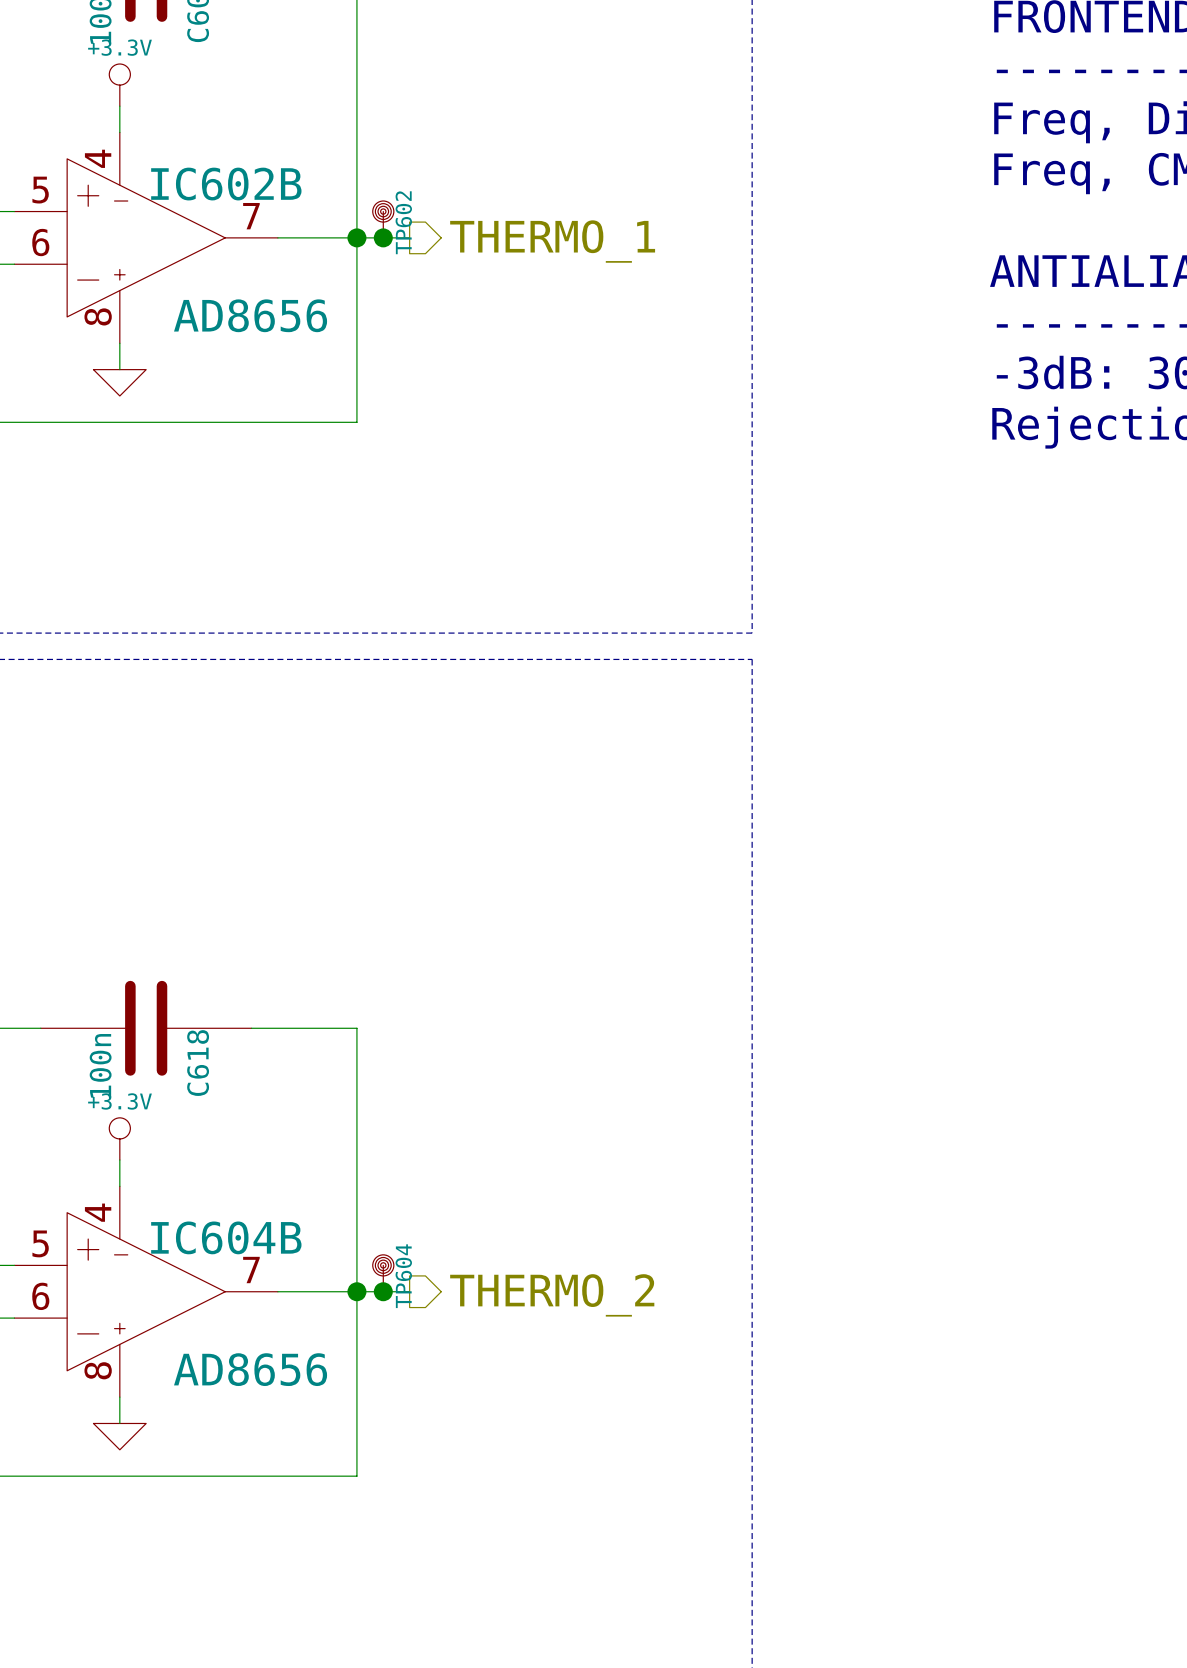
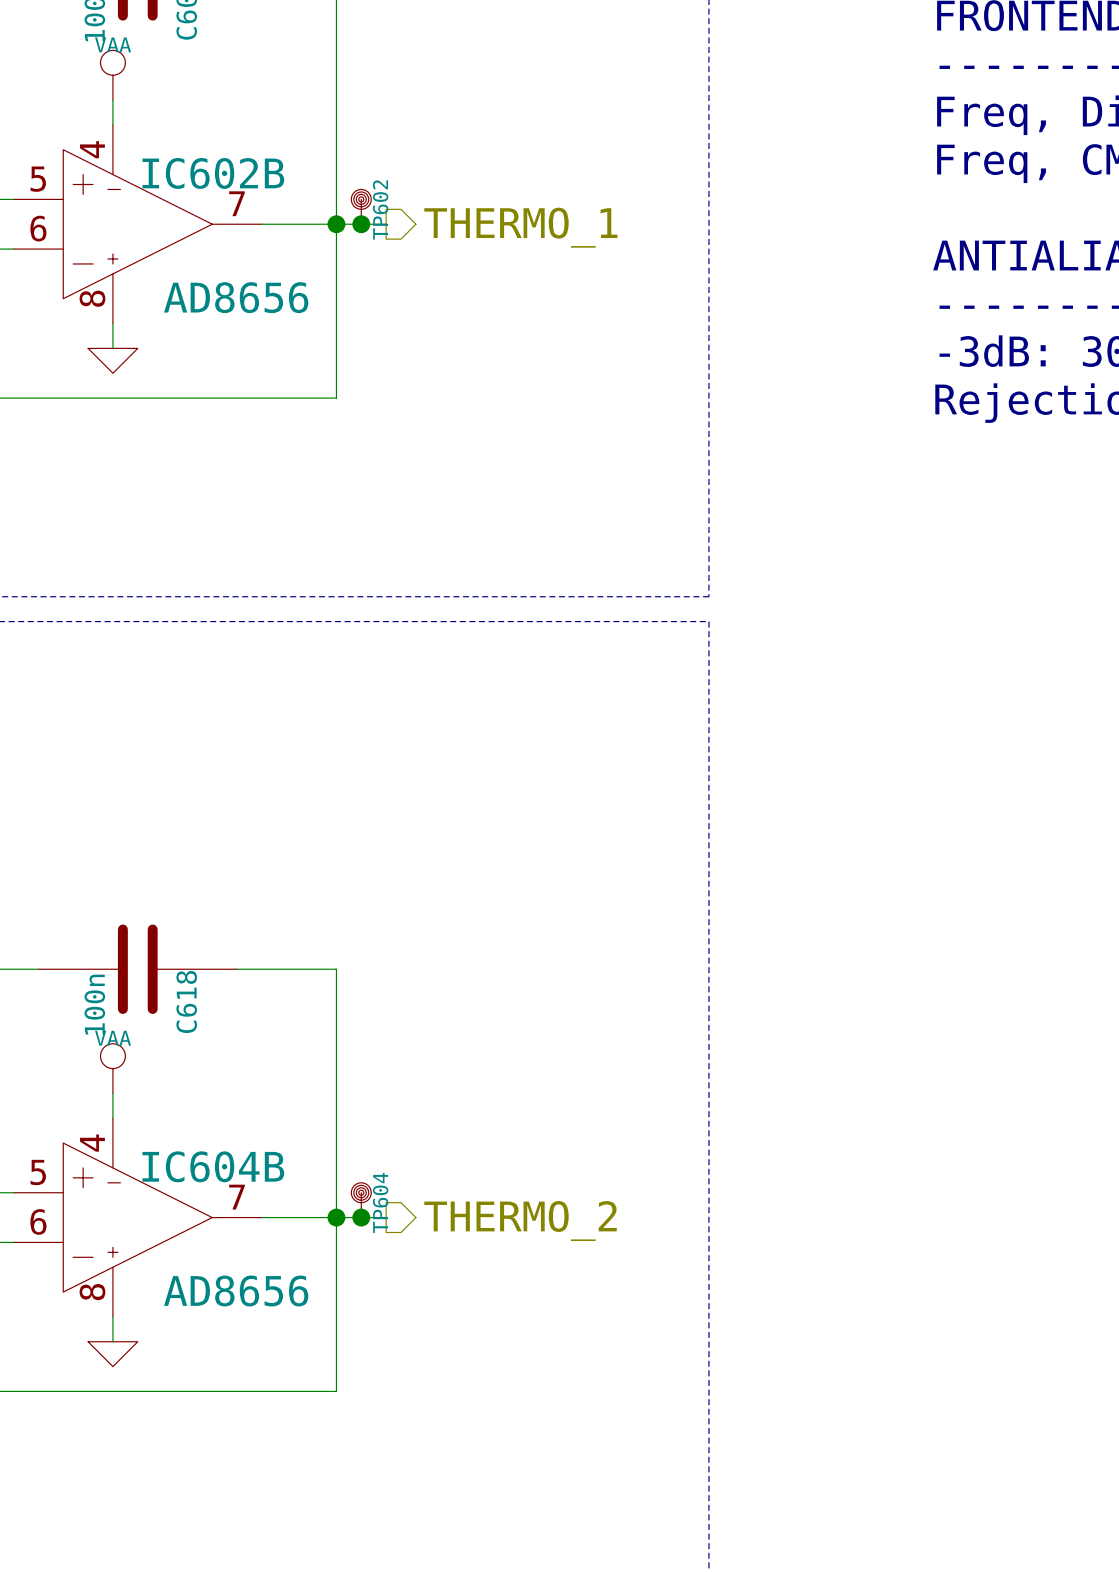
power symbol: +3.3V (119, 85) -> VAA (112, 75)
power symbol: +3.3V (119, 1138) -> VAA (112, 1068)

